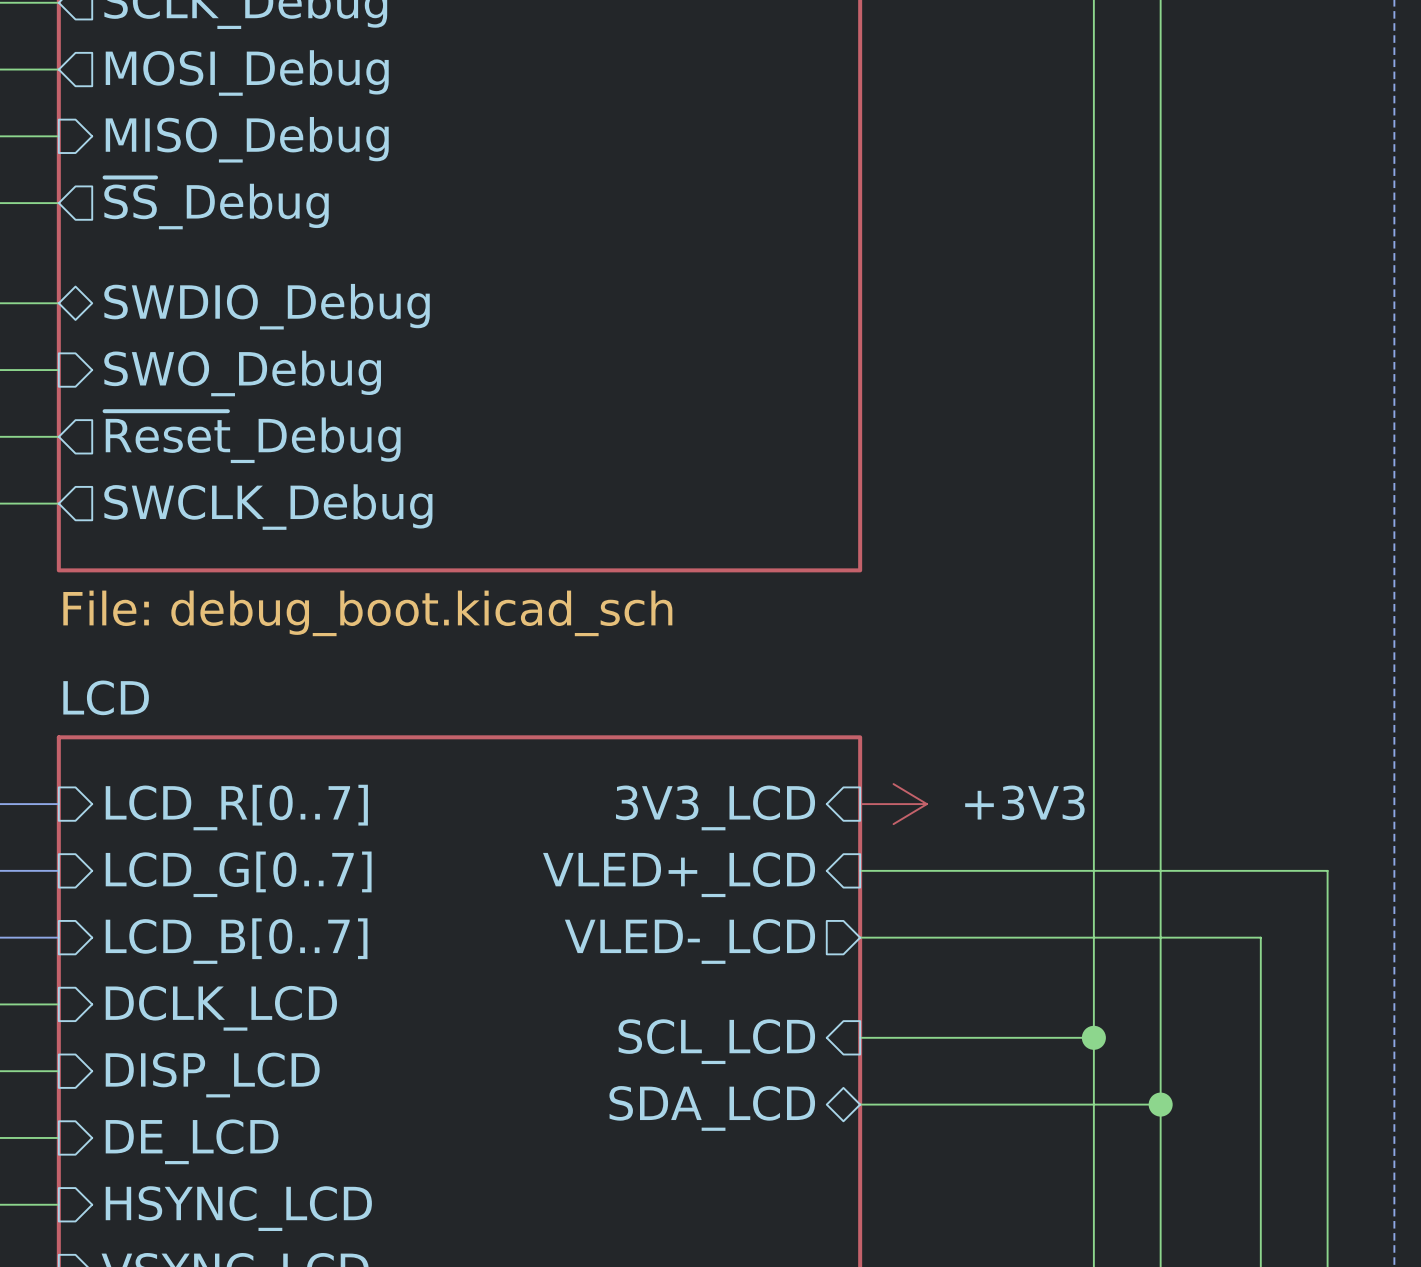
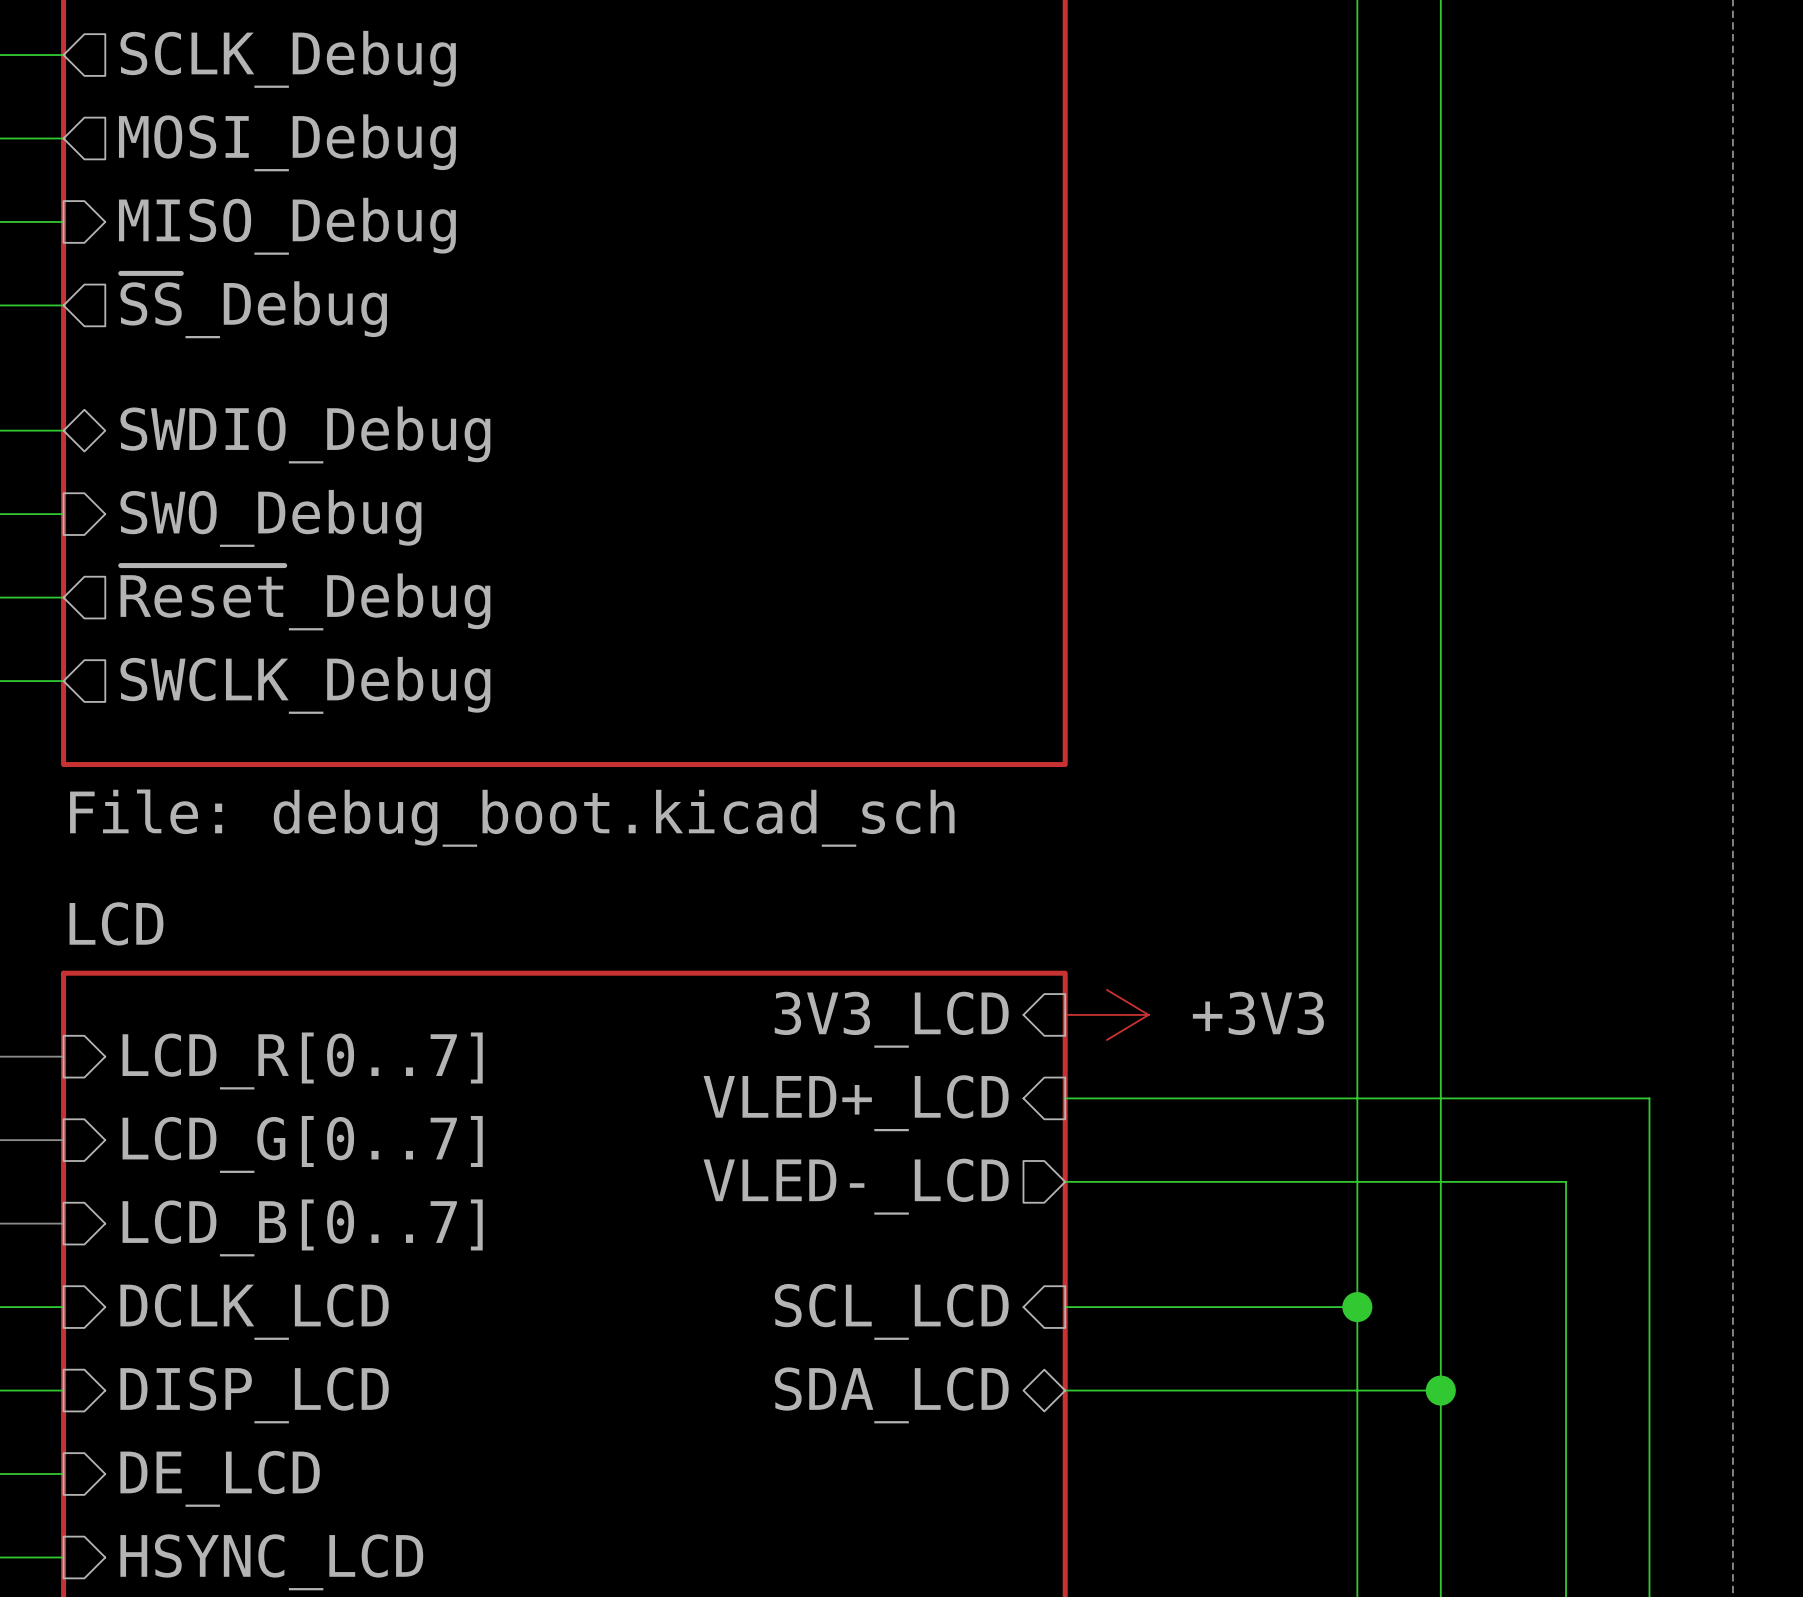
power symbol position: +3V3 (893, 804) -> +3V3 (1106, 1014)
sheet pin position: 3V3_LCD (715, 807) -> 3V3_LCD (891, 1019)
wire: (860, 870) (1327, 870) -> (1065, 1098) (1649, 1098) (1649, 1140)
sheet pin position: VLED+_LCD (679, 874) -> VLED+_LCD (856, 1103)
wire: (860, 937) (1260, 937) -> (1065, 1181) (1566, 1181) (1566, 1223)
sheet pin position: VLED-_LCD (689, 941) -> VLED-_LCD (856, 1186)
wire: (860, 1037) (1093, 1037) -> (1065, 1307) (1357, 1307)
junction position: (1093, 1037) -> (1357, 1307)
sheet pin position: SCL_LCD (716, 1041) -> SCL_LCD (891, 1311)
wire: (860, 1104) (1160, 1104) -> (1065, 1390) (1440, 1390)
junction position: (1160, 1104) -> (1440, 1390)
sheet pin position: SDA_LCD (712, 1108) -> SDA_LCD (891, 1395)

